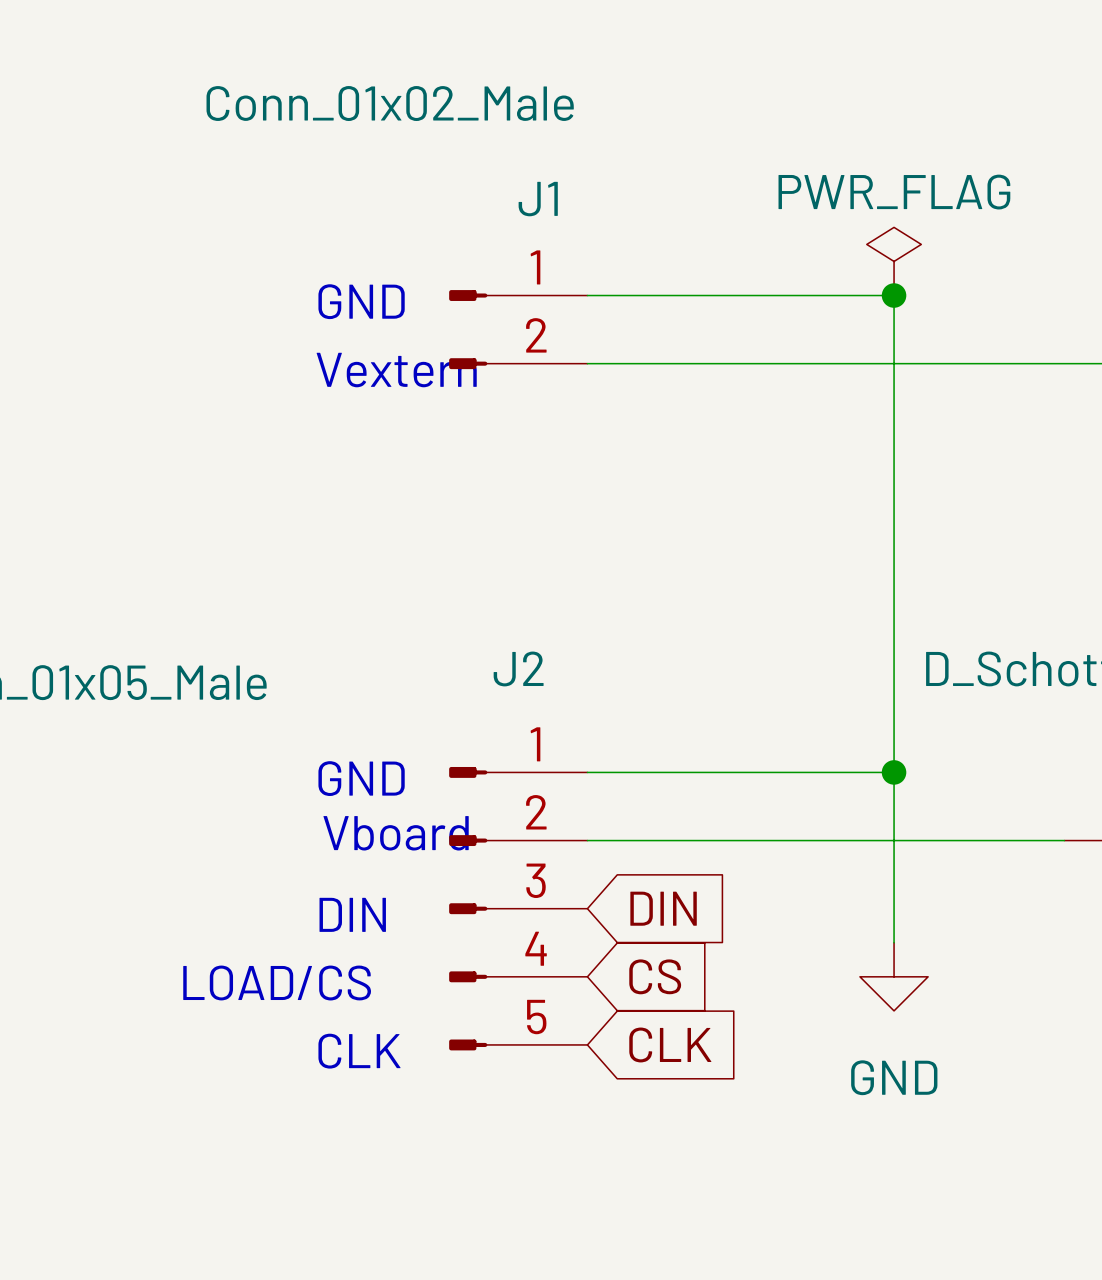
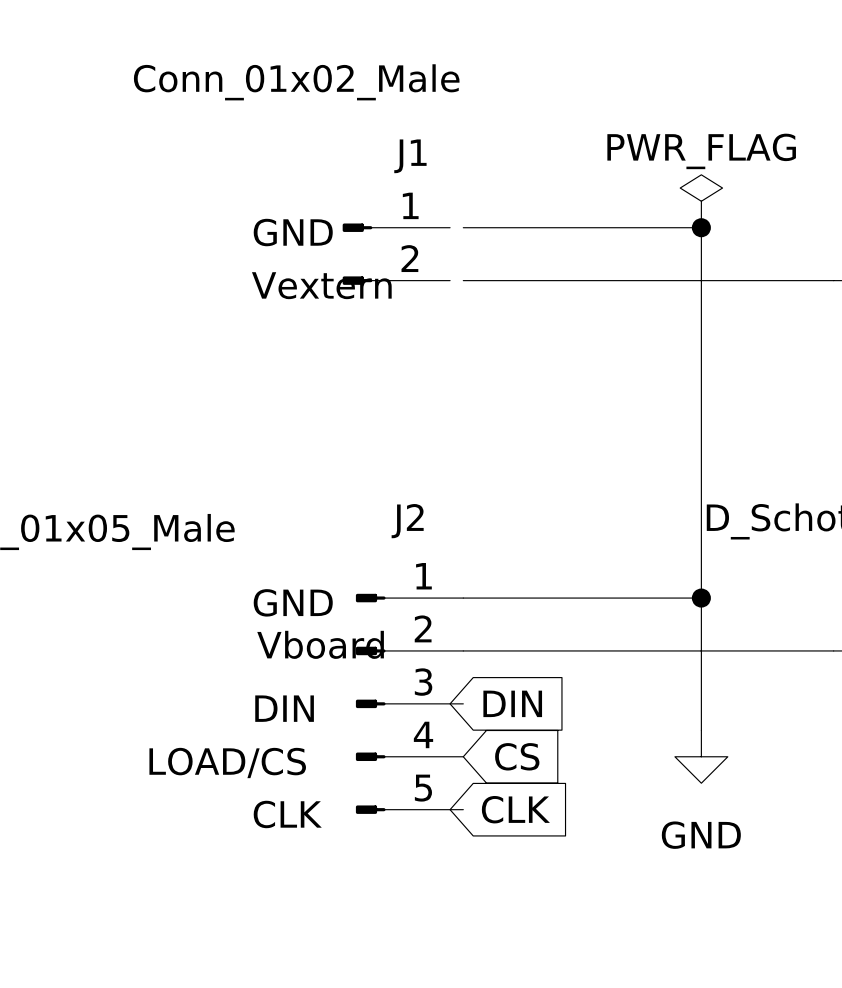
J1 position: (518, 329) -> (396, 254)
global label position: DIN (663, 908) -> DIN (512, 703)
global label position: CLK (670, 1044) -> CLK (515, 809)

